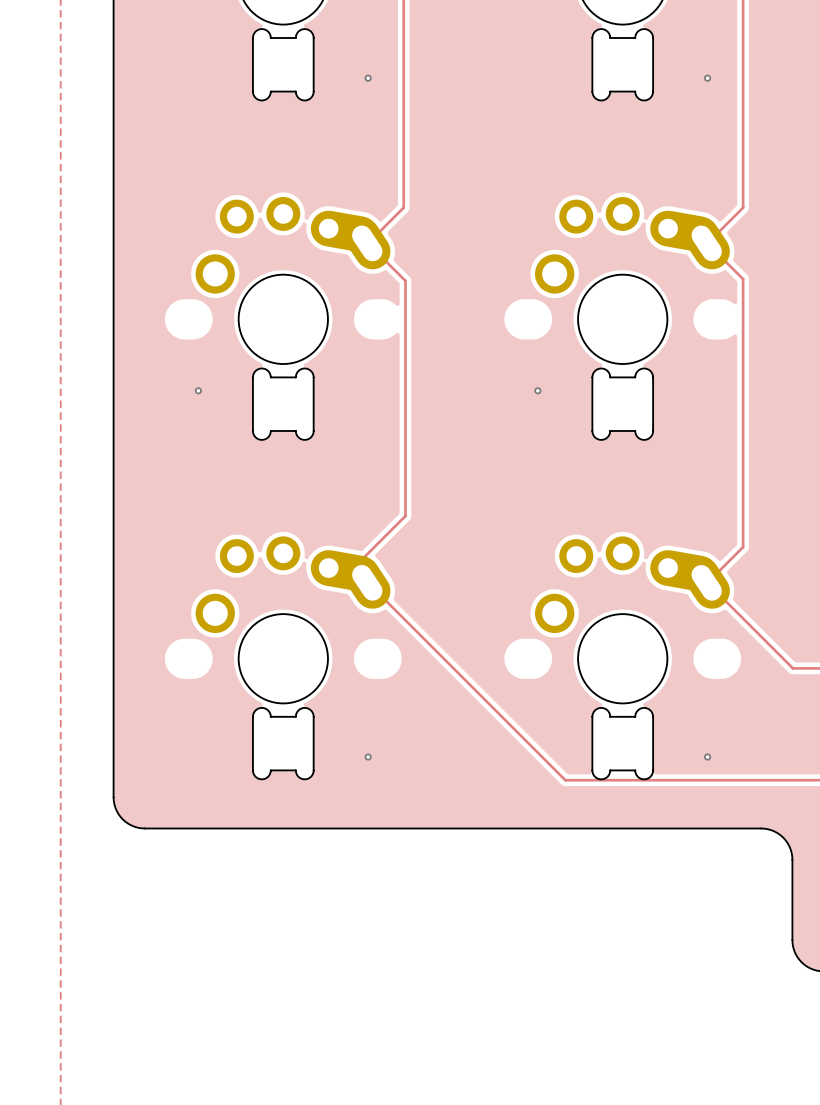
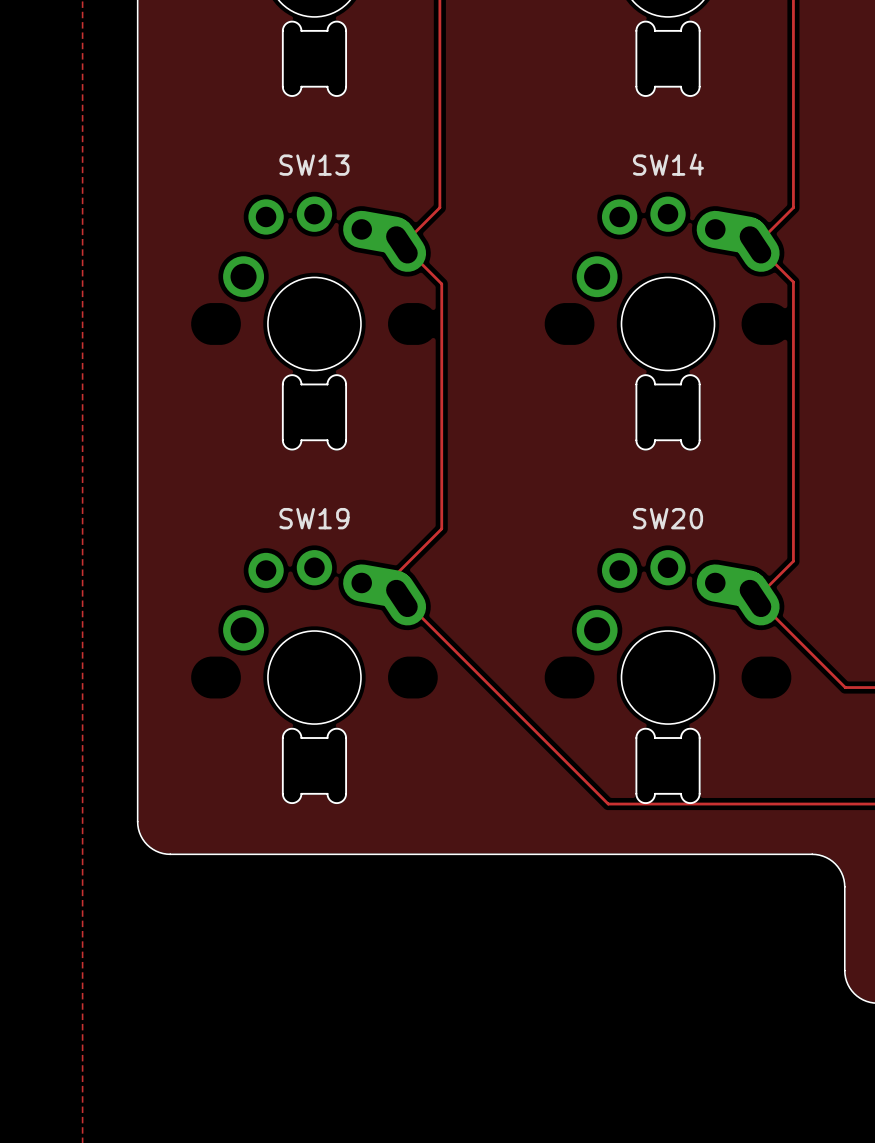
via: (368, 78) -> none
via: (707, 78) -> none
SW13 name: none -> SW13 (314, 165)
SW14 name: none -> SW14 (668, 164)
via: (198, 390) -> none
via: (537, 390) -> none
SW19 name: none -> SW19 (314, 518)
SW20 name: none -> SW20 (668, 518)
via: (368, 757) -> none
via: (707, 757) -> none

